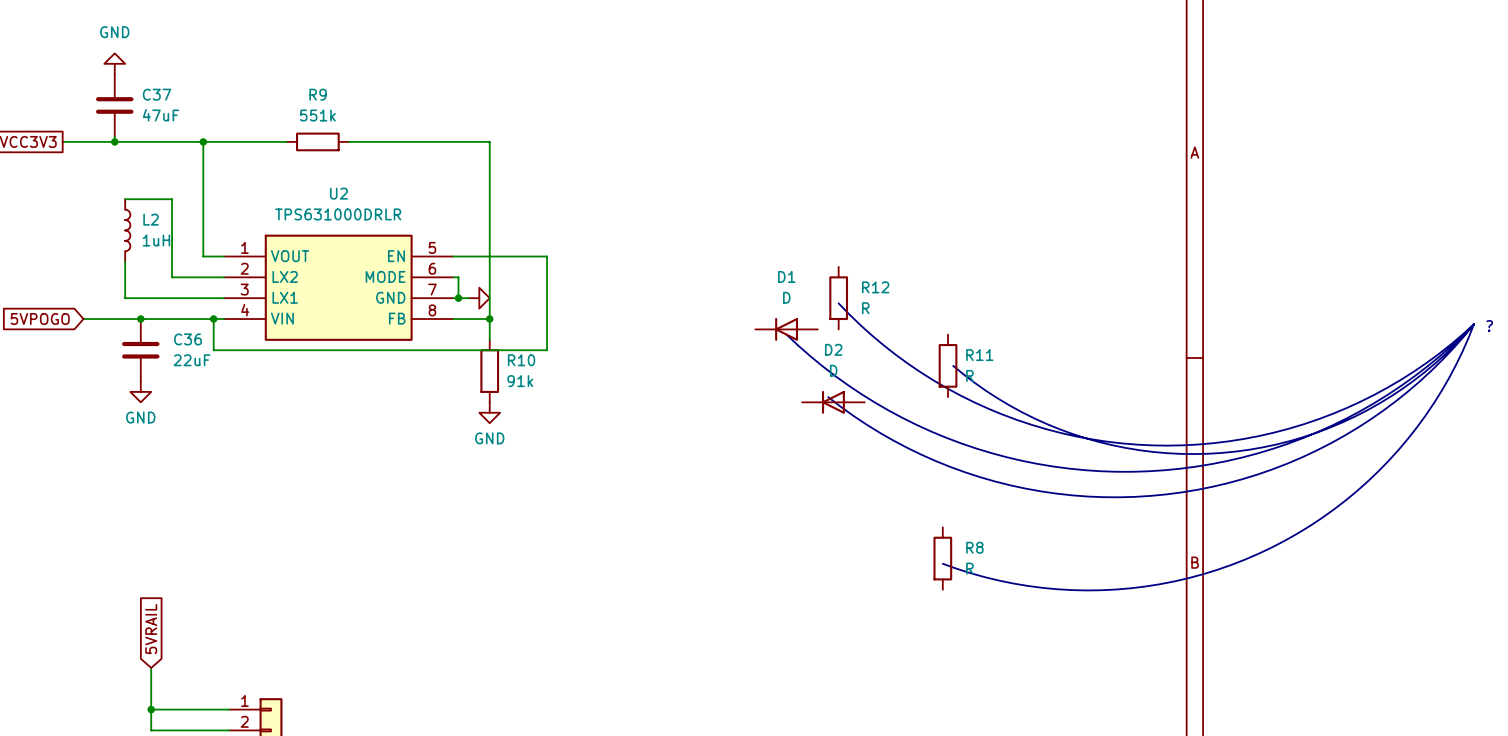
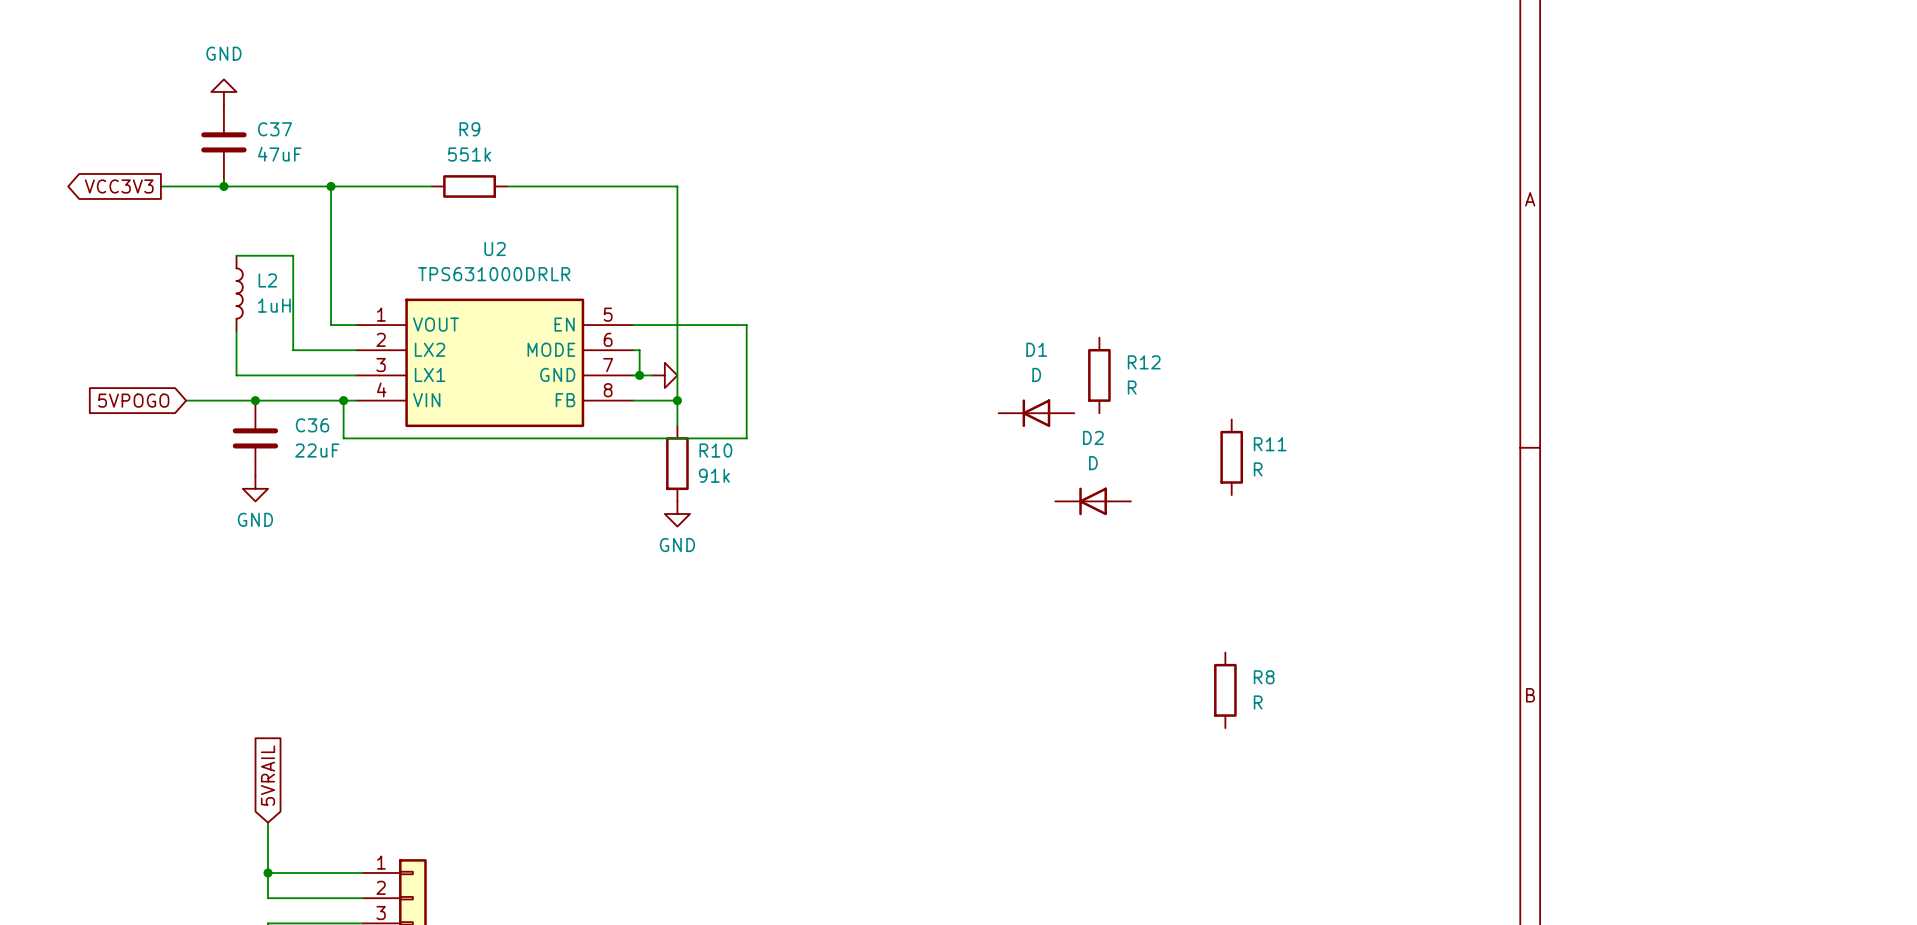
line: (838, 303) (871, 335) (895, 354) (933, 380) (974, 402) (1016, 419) (1060, 432) (1106, 441) (1152, 445) (1198, 444) (1243, 438) (1288, 428) (1332, 414) (1374, 394) (1400, 379) (1438, 353) (1474, 324) -> none
line: (1474, 324) (1456, 364) (1442, 390) (1417, 426) (1388, 460) (1357, 491) (1322, 517) (1284, 540) (1258, 554) (1230, 565) (1188, 578) (1145, 586) (1101, 590) (1057, 589) (1028, 585) (984, 577) (942, 563) -> none
line: (1474, 324) (1439, 356) (1401, 385) (1360, 410) (1317, 431) (1273, 448) (1227, 461) (1180, 468) (1132, 471) (1084, 470) (1037, 463) (991, 453) (945, 437) (902, 417) (861, 393) (822, 366) (786, 334) -> none
line: (1474, 324) (1445, 354) (1413, 380) (1379, 403) (1354, 416) (1316, 432) (1290, 441) (1263, 447) (1222, 452) (1180, 453) (1139, 450) (1098, 441) (1072, 433) (1046, 423) (1009, 405) (974, 382) (953, 365) -> none
line: (1474, 324) (1442, 359) (1408, 391) (1370, 419) (1330, 443) (1287, 463) (1243, 479) (1197, 489) (1166, 494) (1119, 497) (1072, 495) (1025, 488) (980, 477) (935, 461) (893, 440) (866, 424) (828, 397) -> none
text: ? (1489, 326) -> none

